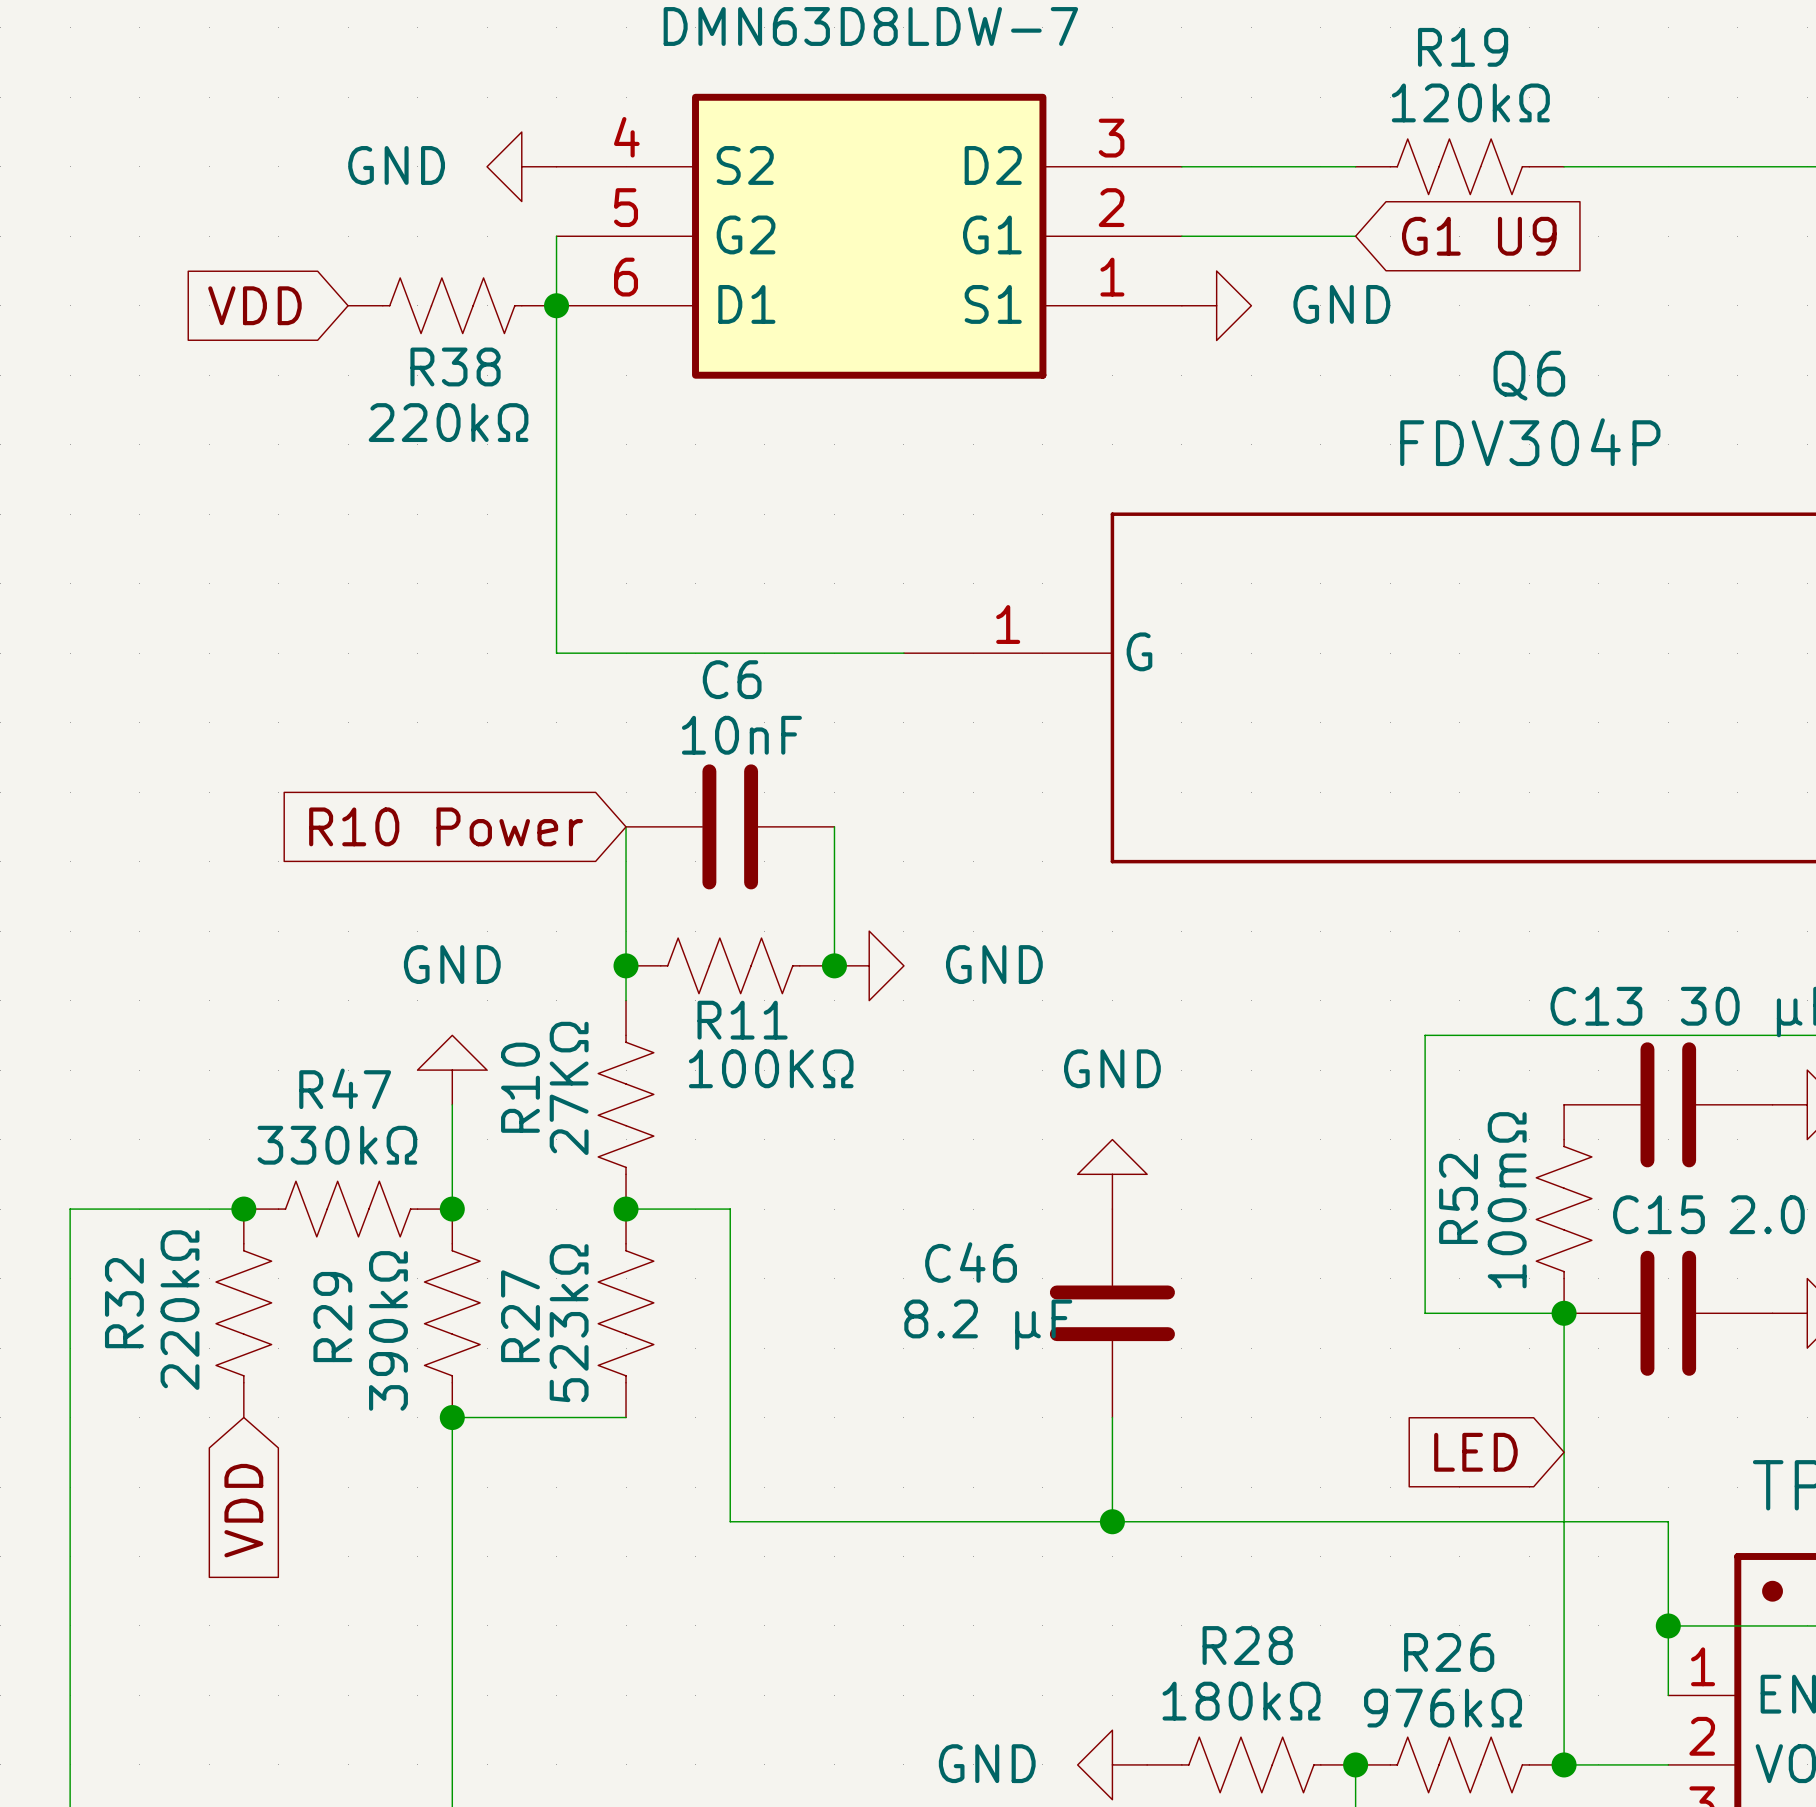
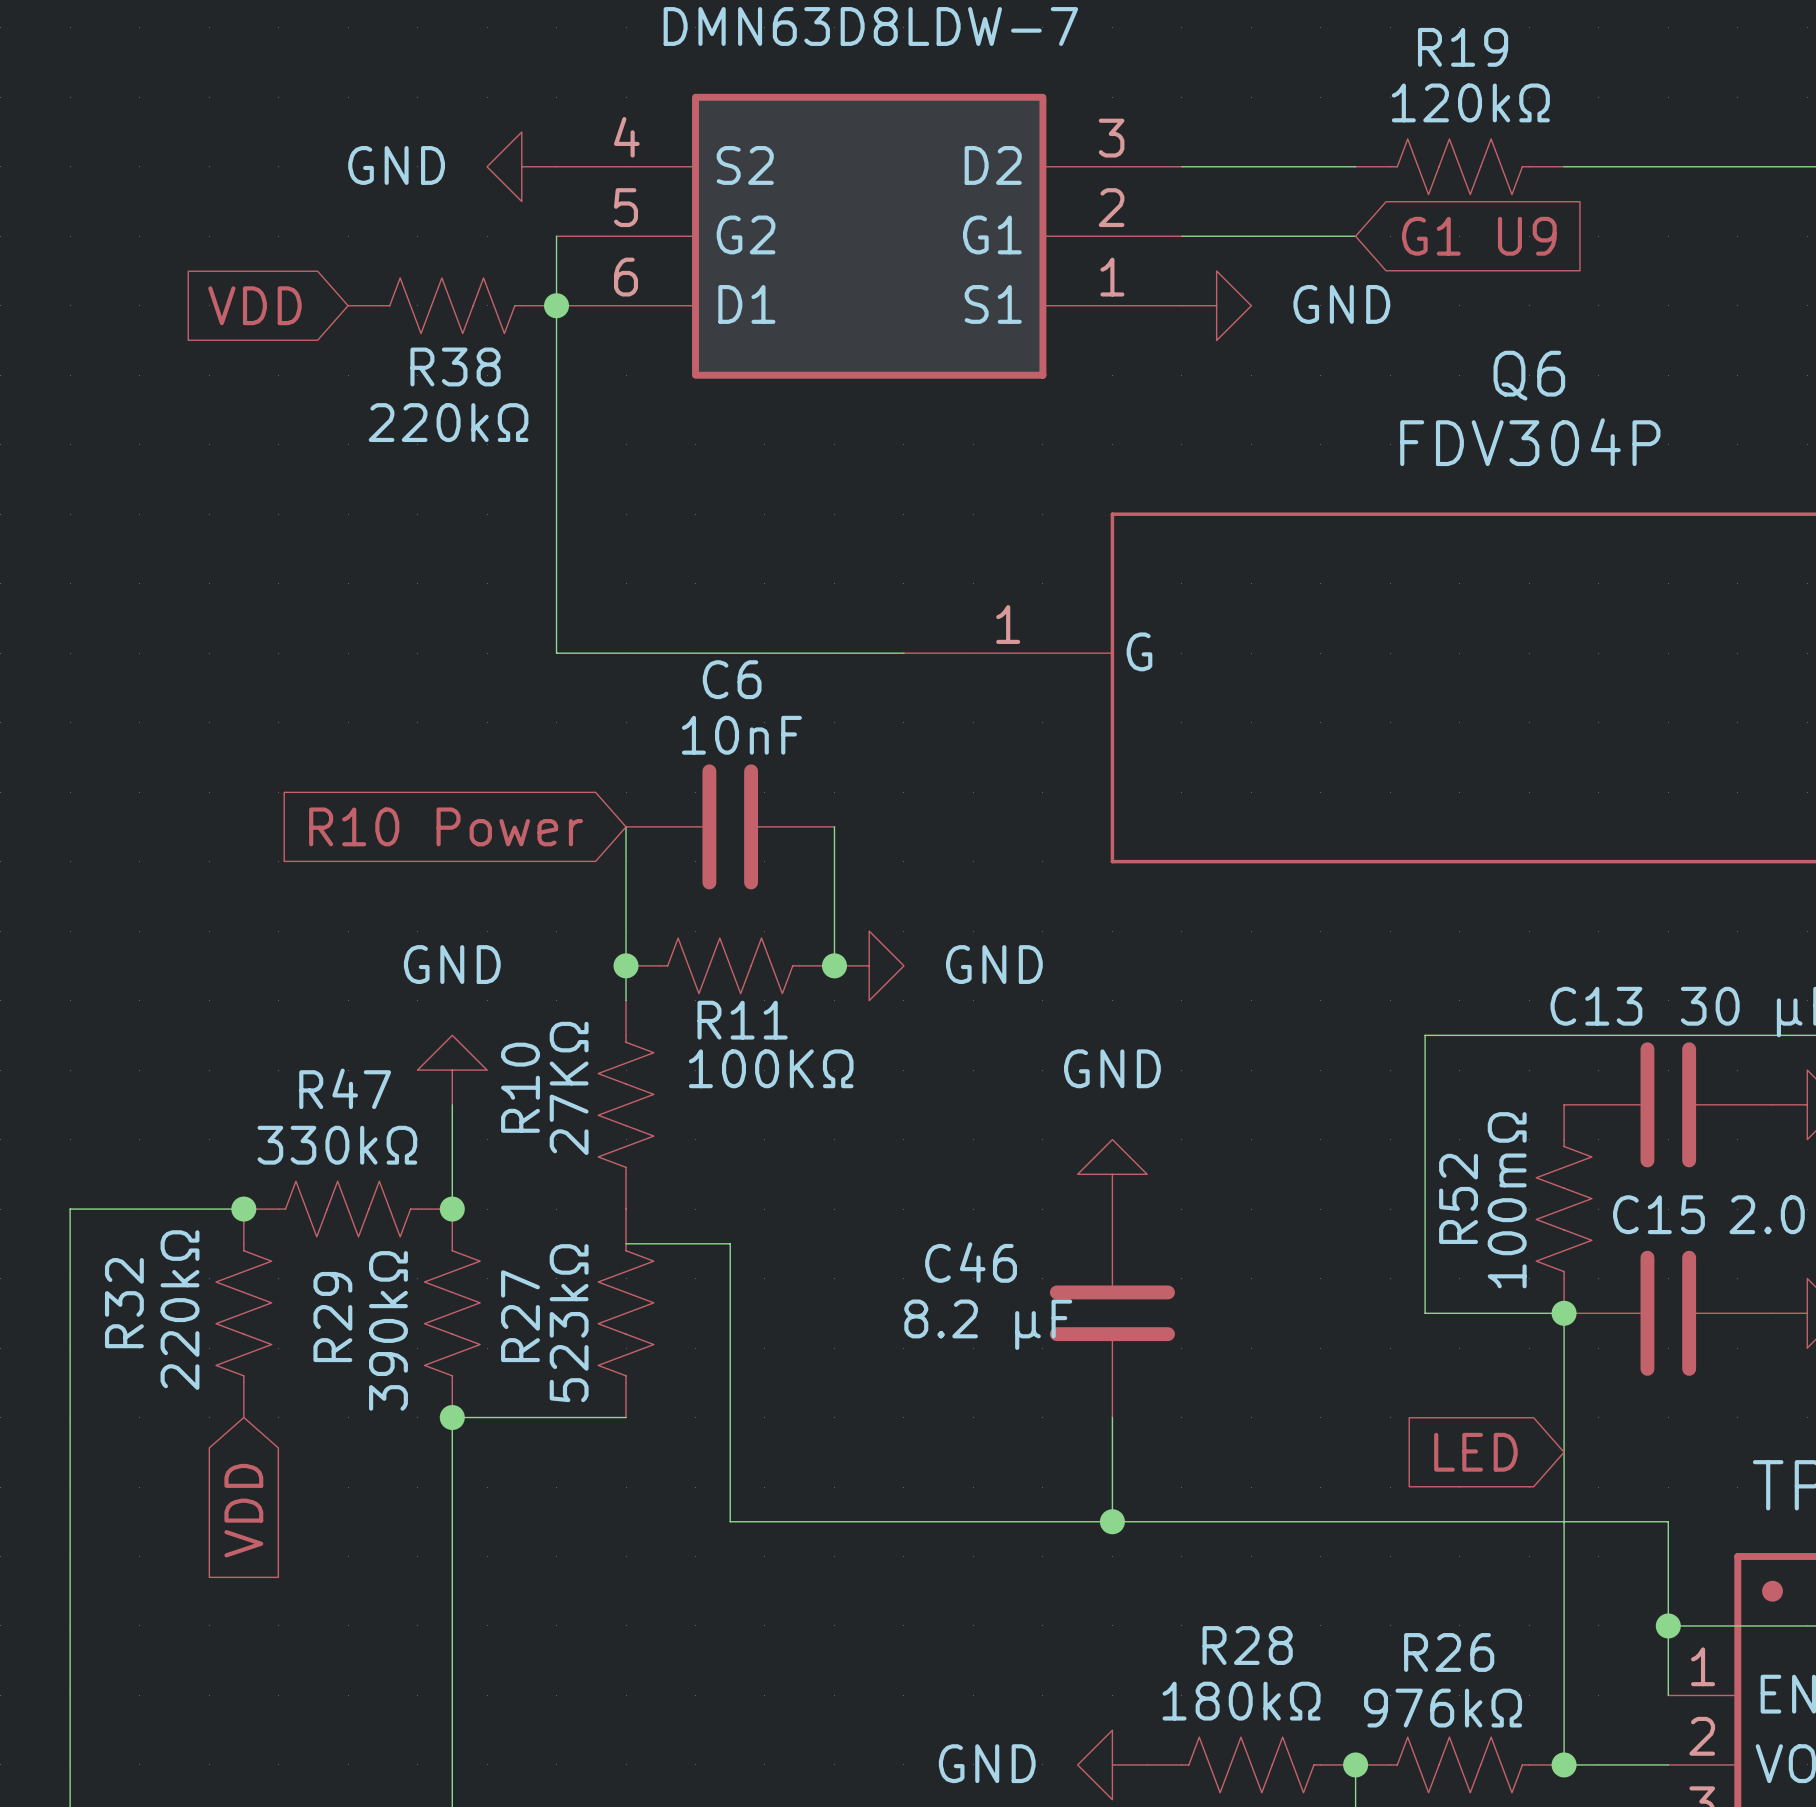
wire: (626, 1209) (730, 1209) (730, 1243) -> (626, 1243) (730, 1243)
junction: (626, 1209) -> none

